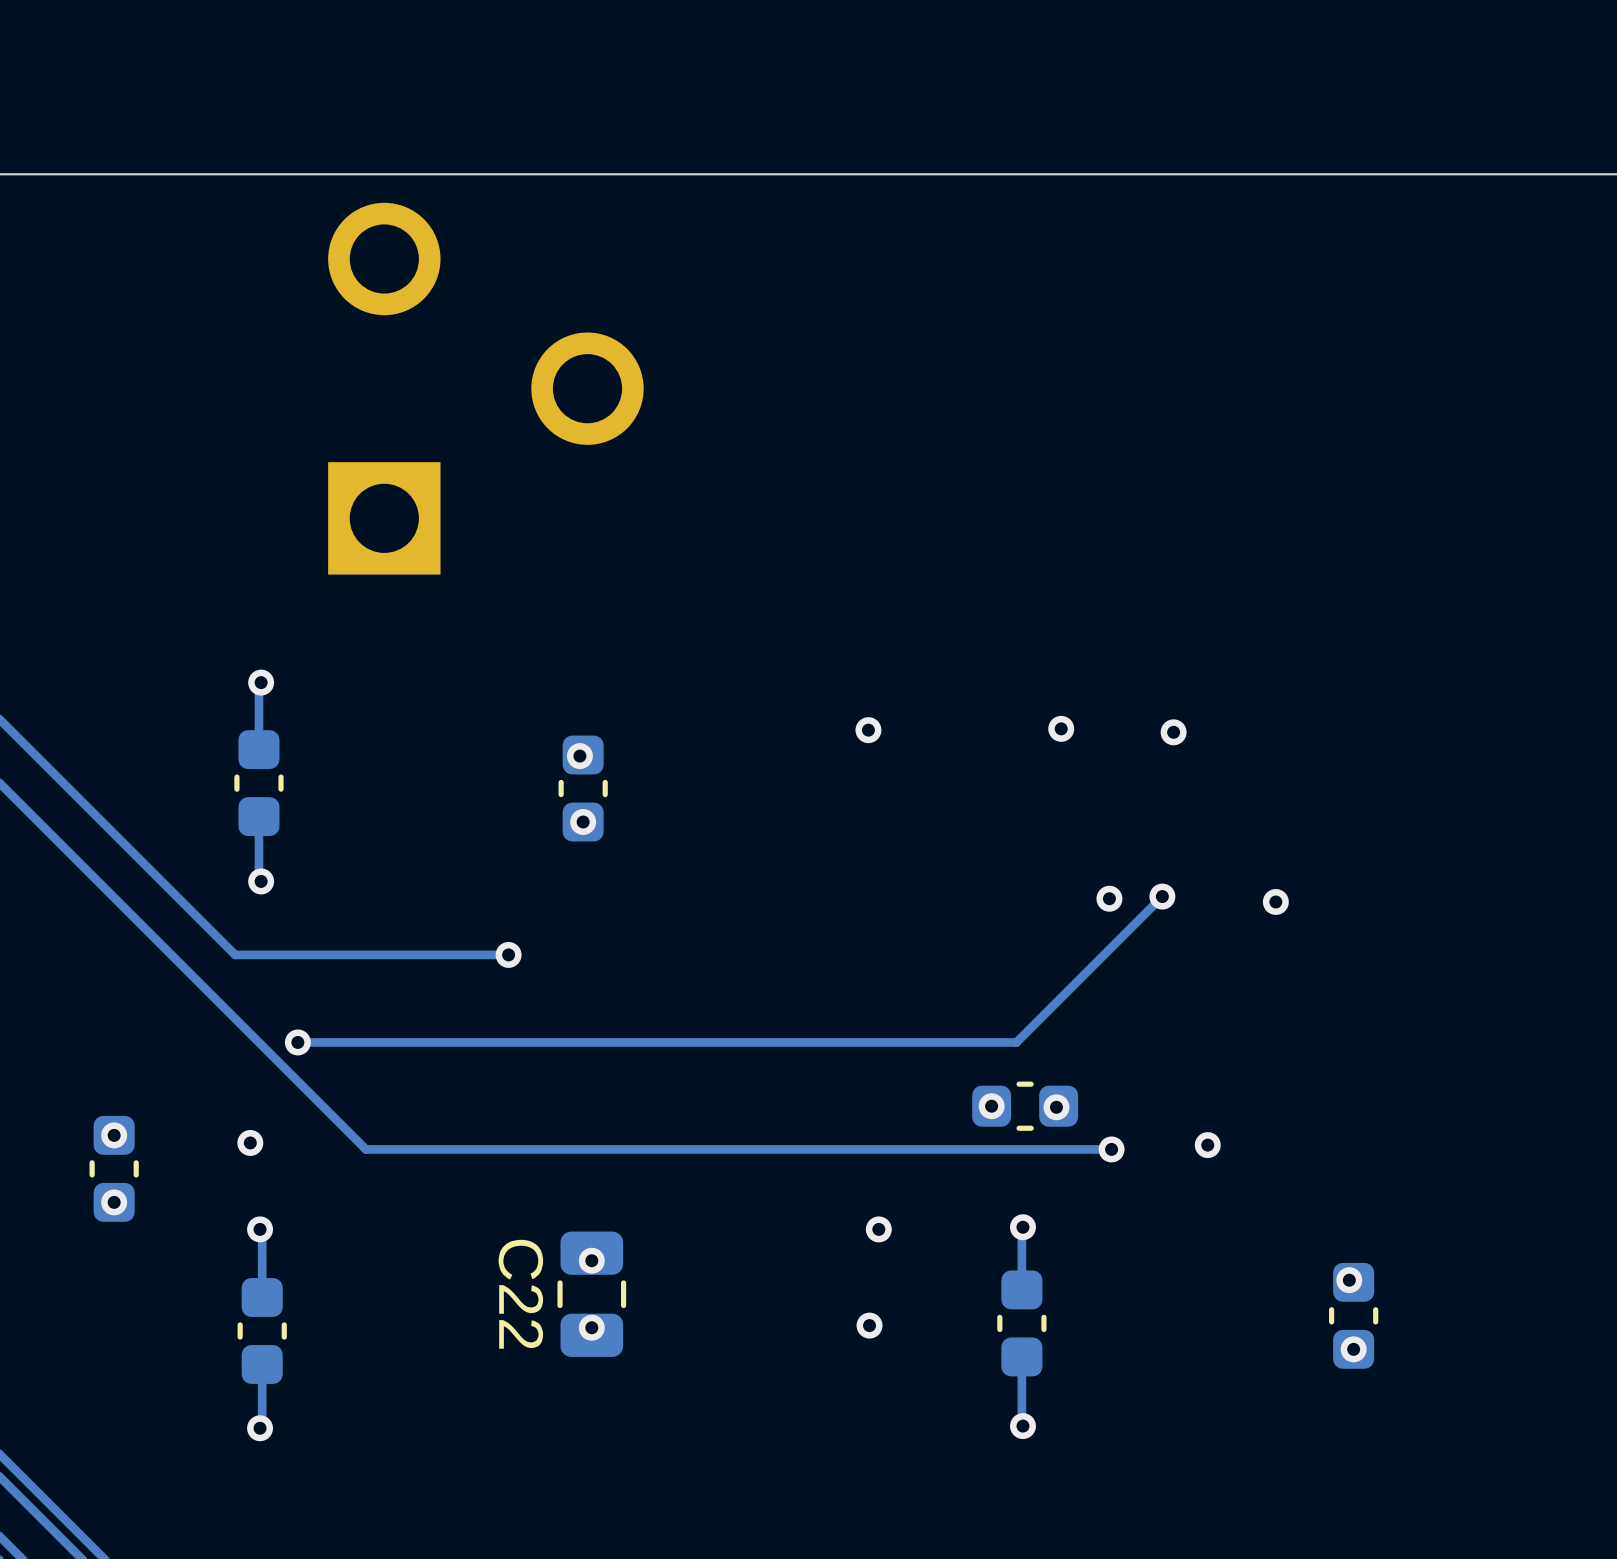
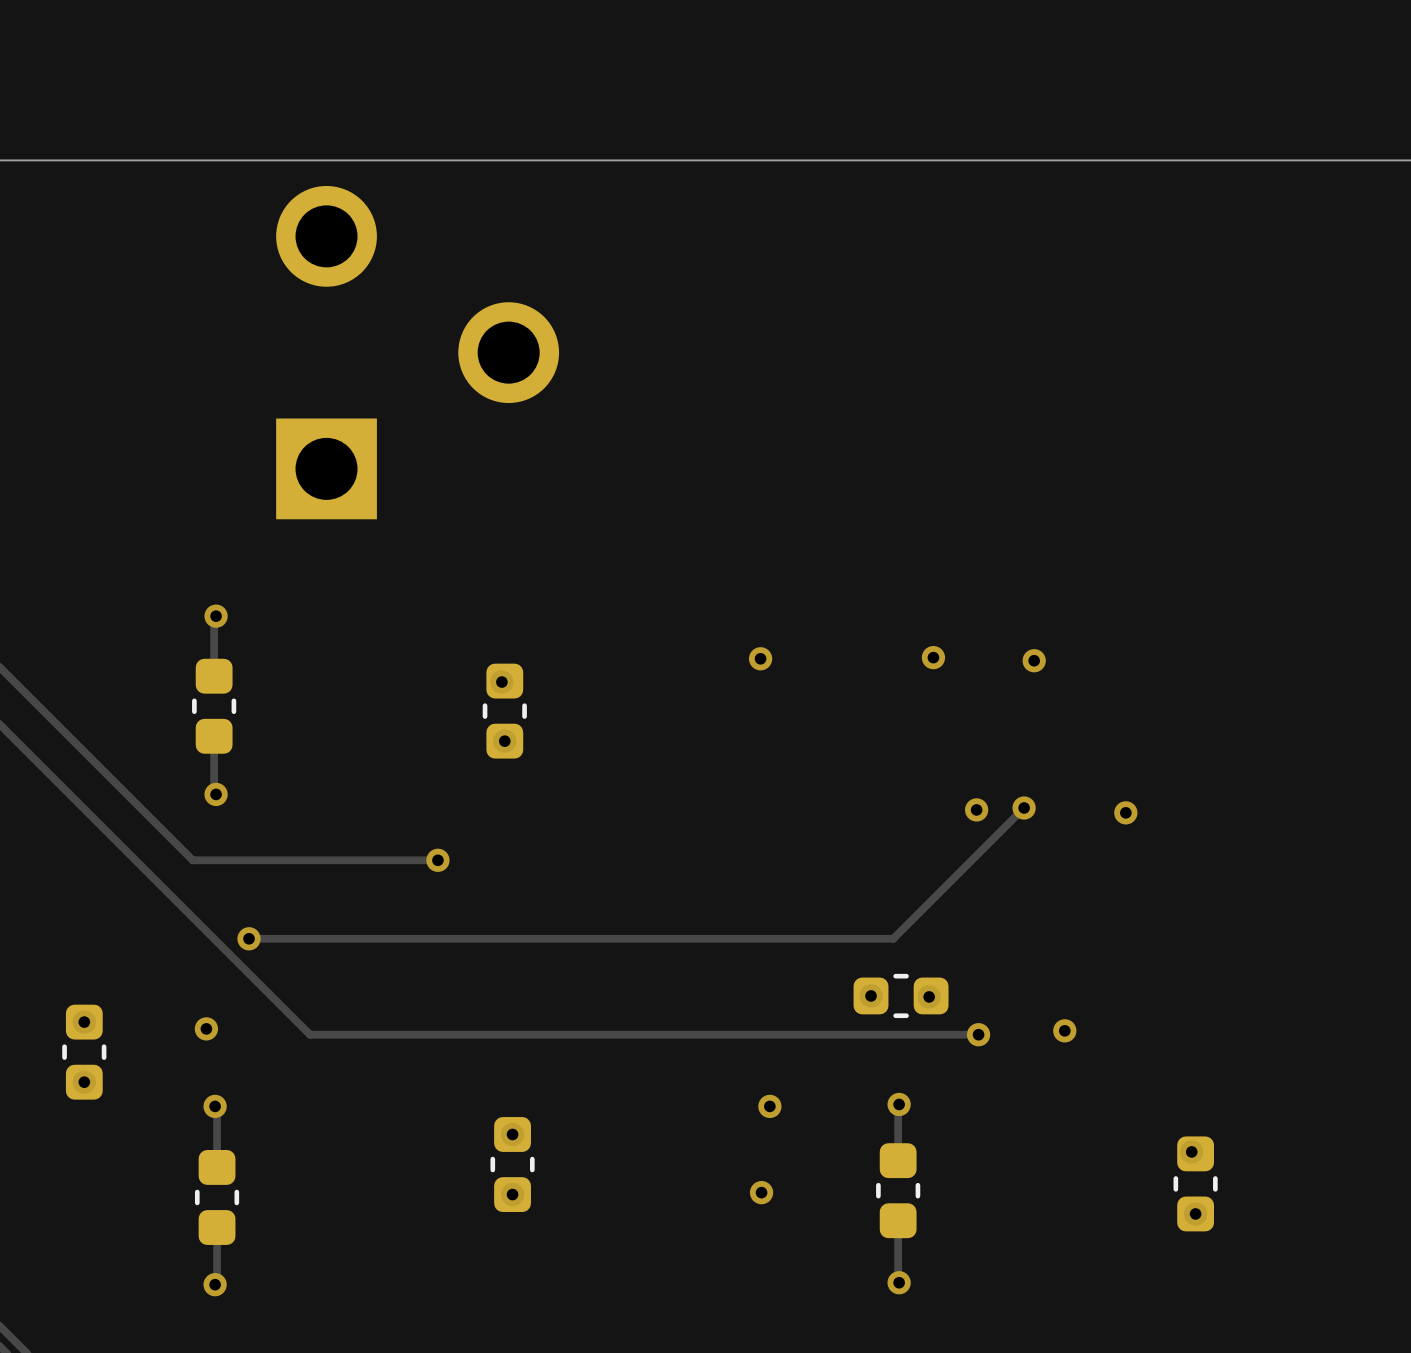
C22: (591, 1294) -> none
part: none -> (512, 1164)

